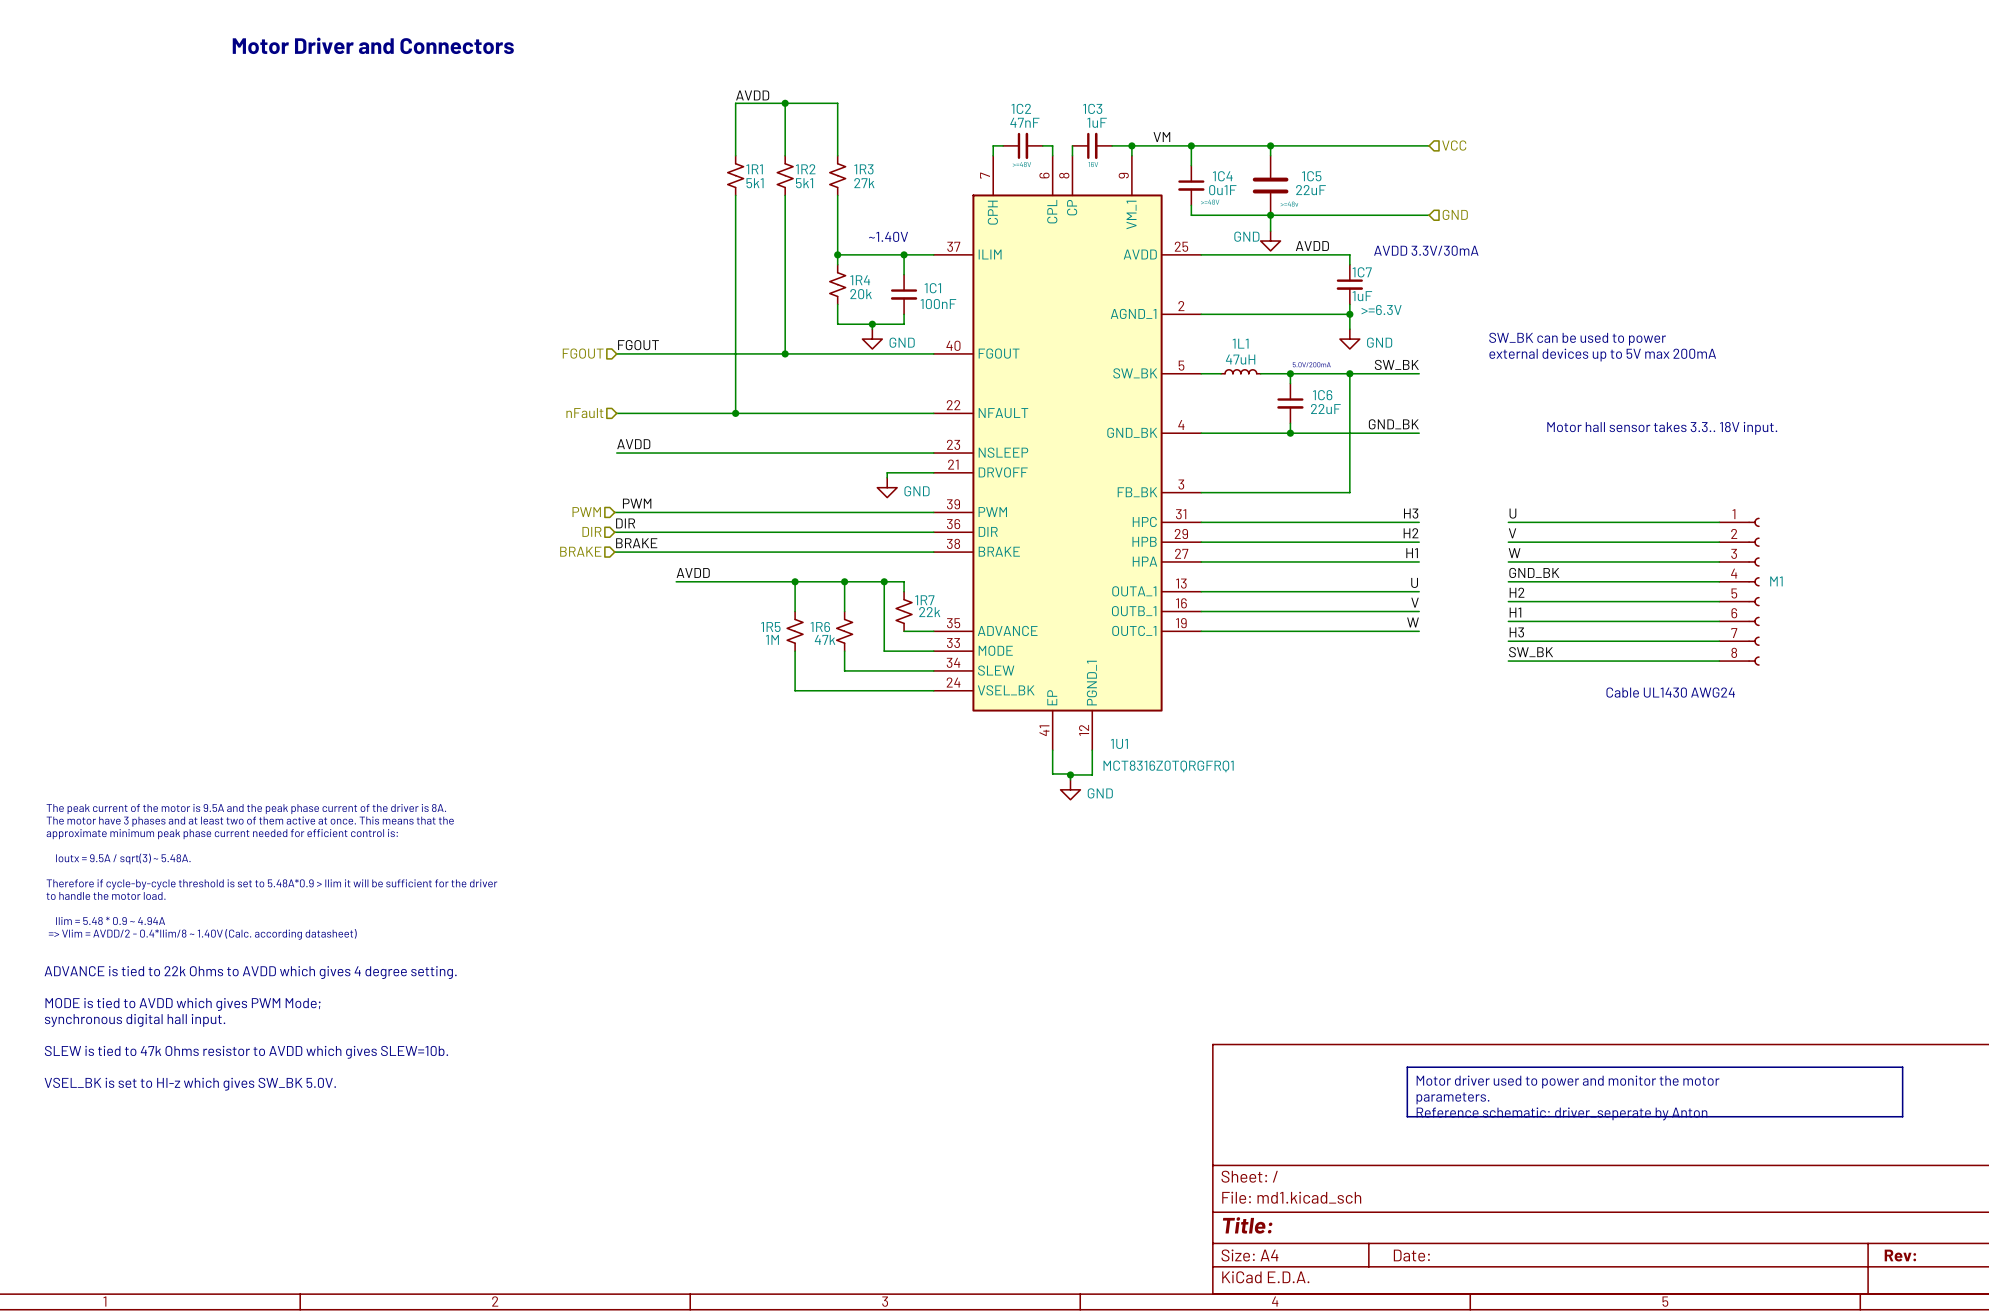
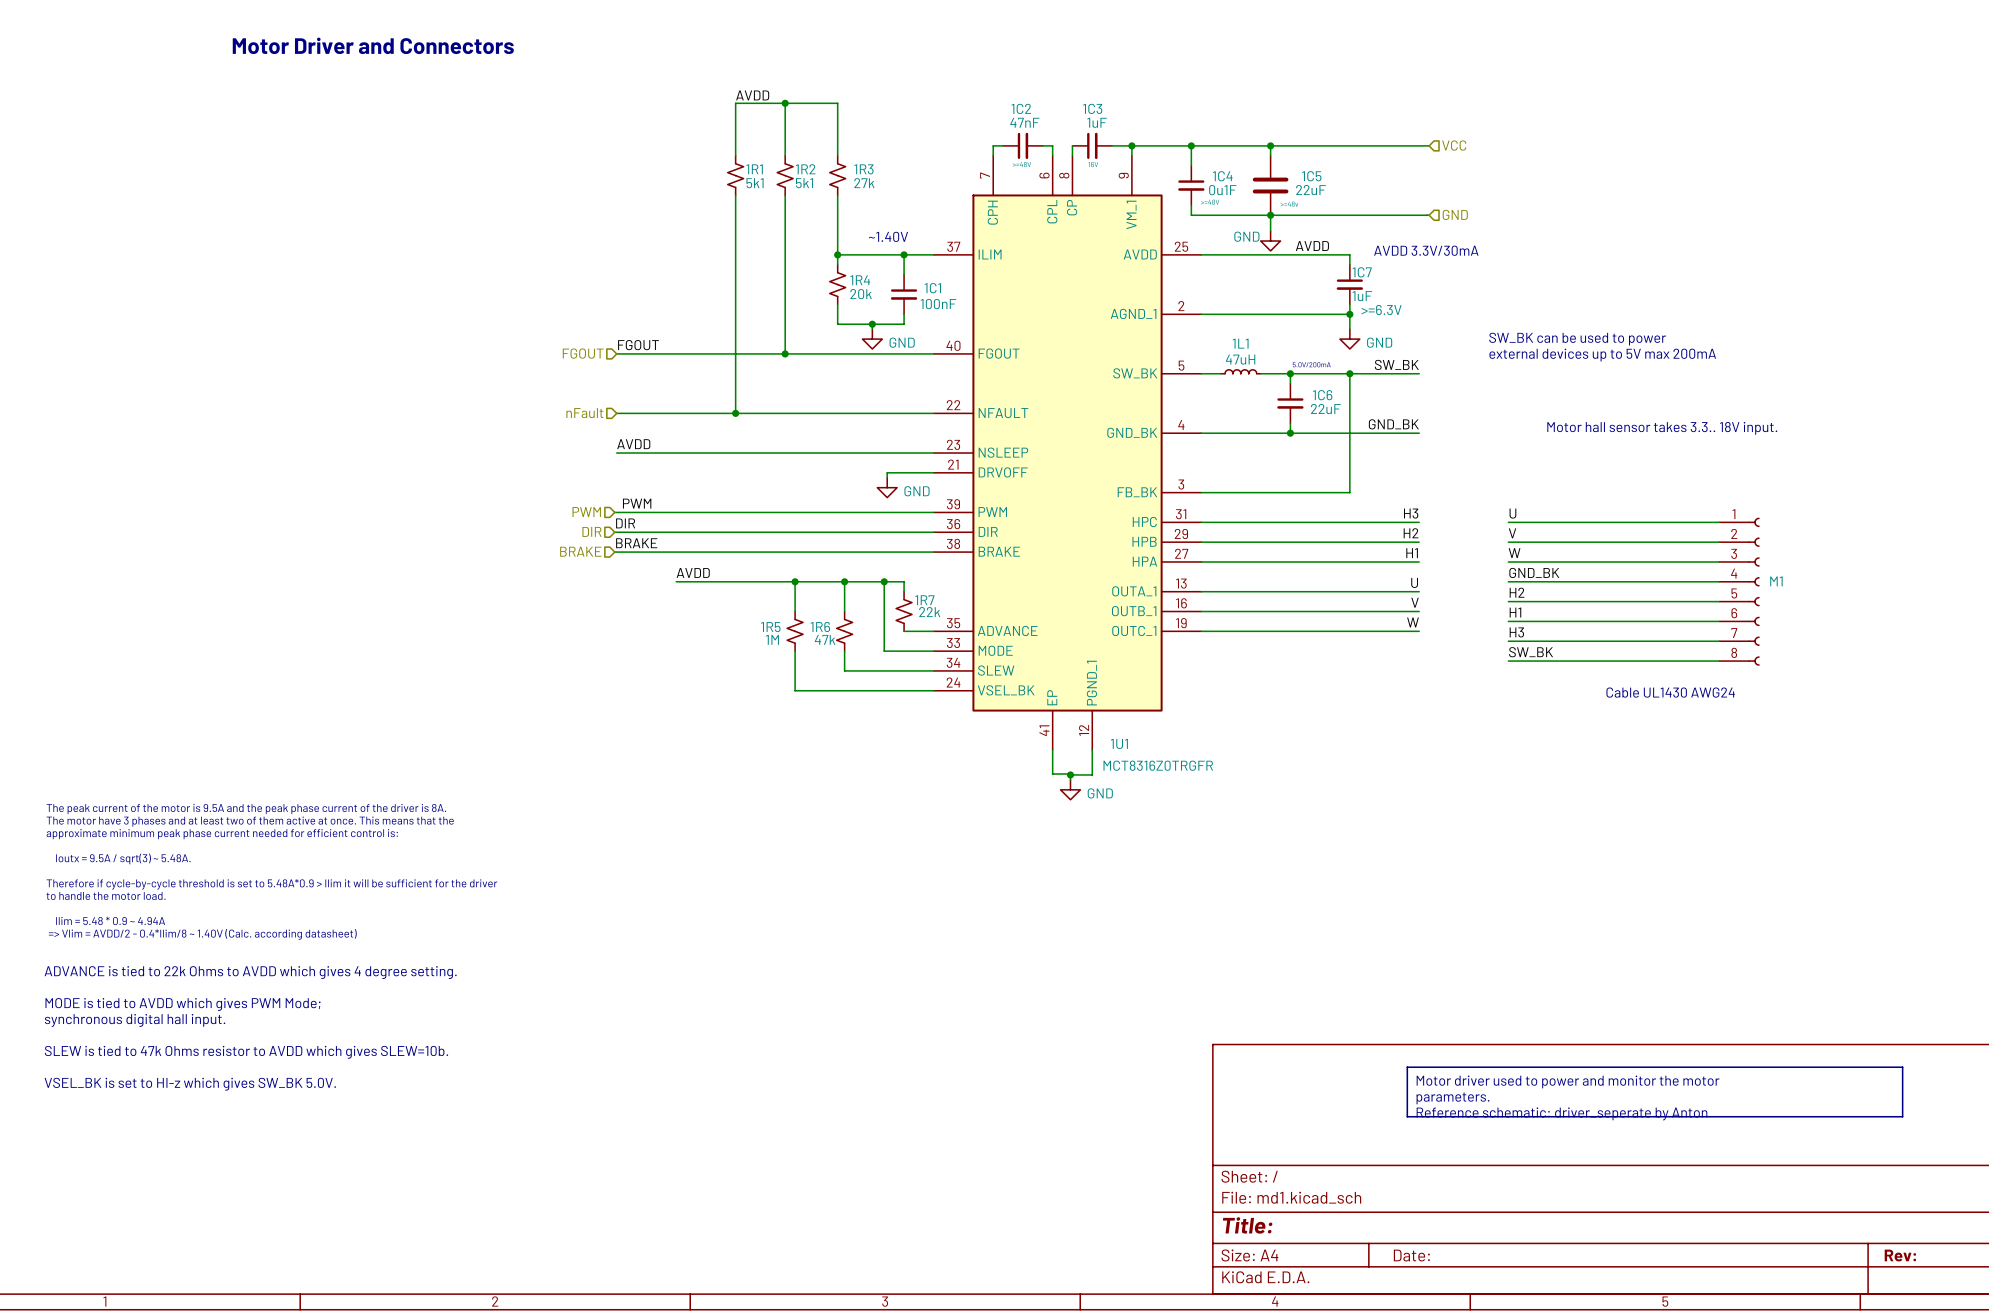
label: VM (1161, 137) -> none
1U1 value: MCT8316Z0TQRGFRQ1 (1168, 766) -> MCT8316Z0TRGFR (1158, 765)

